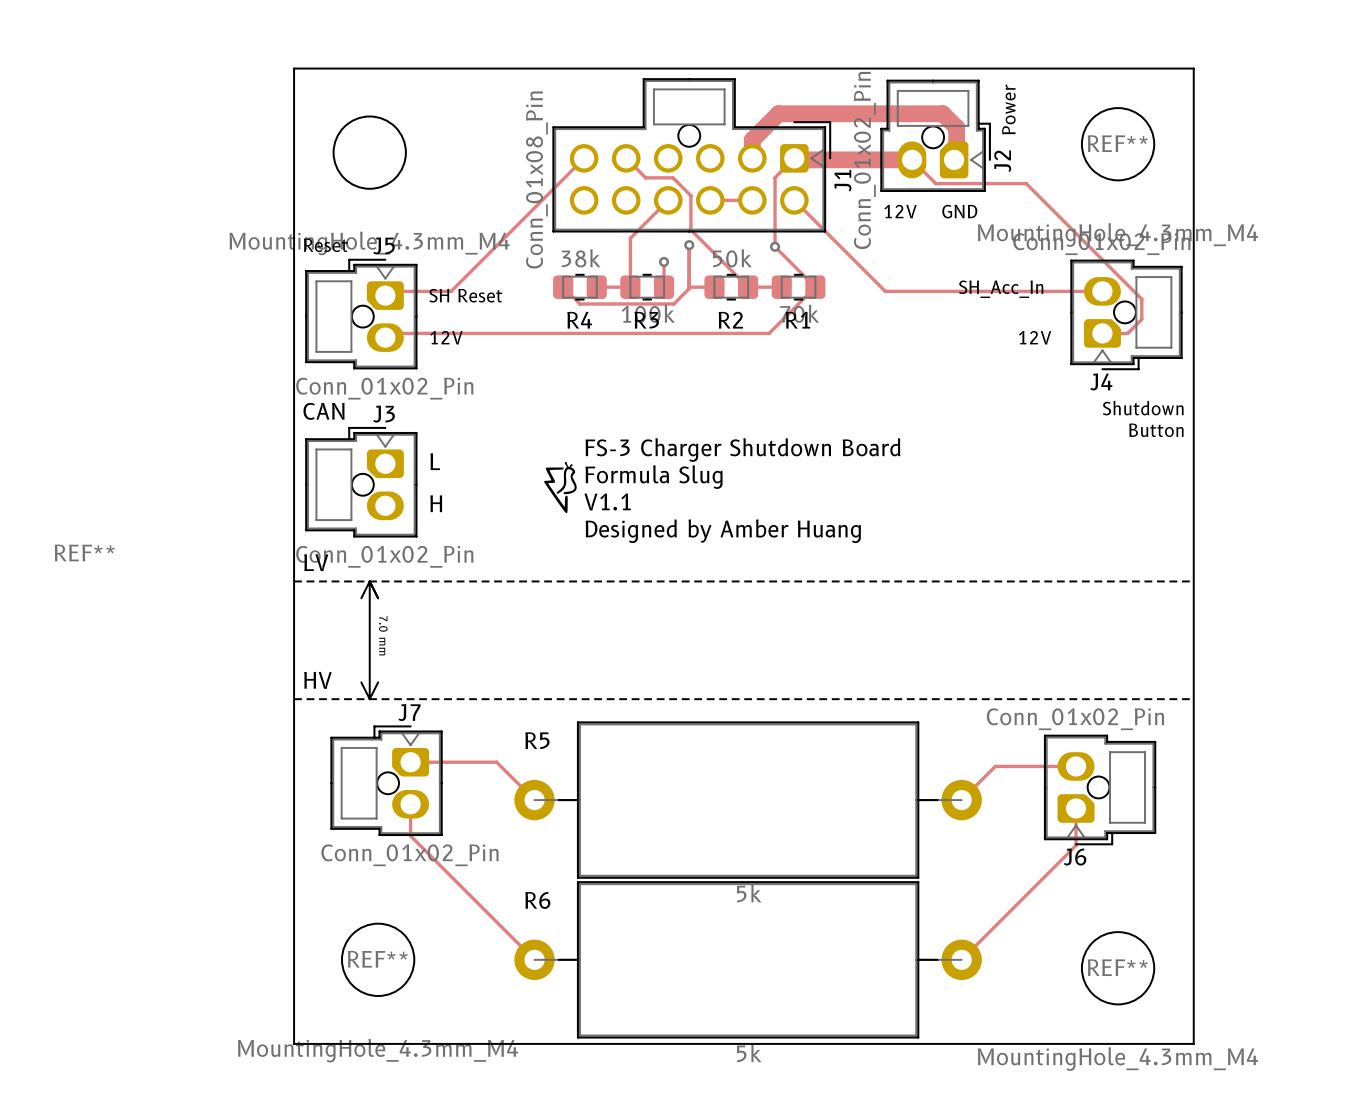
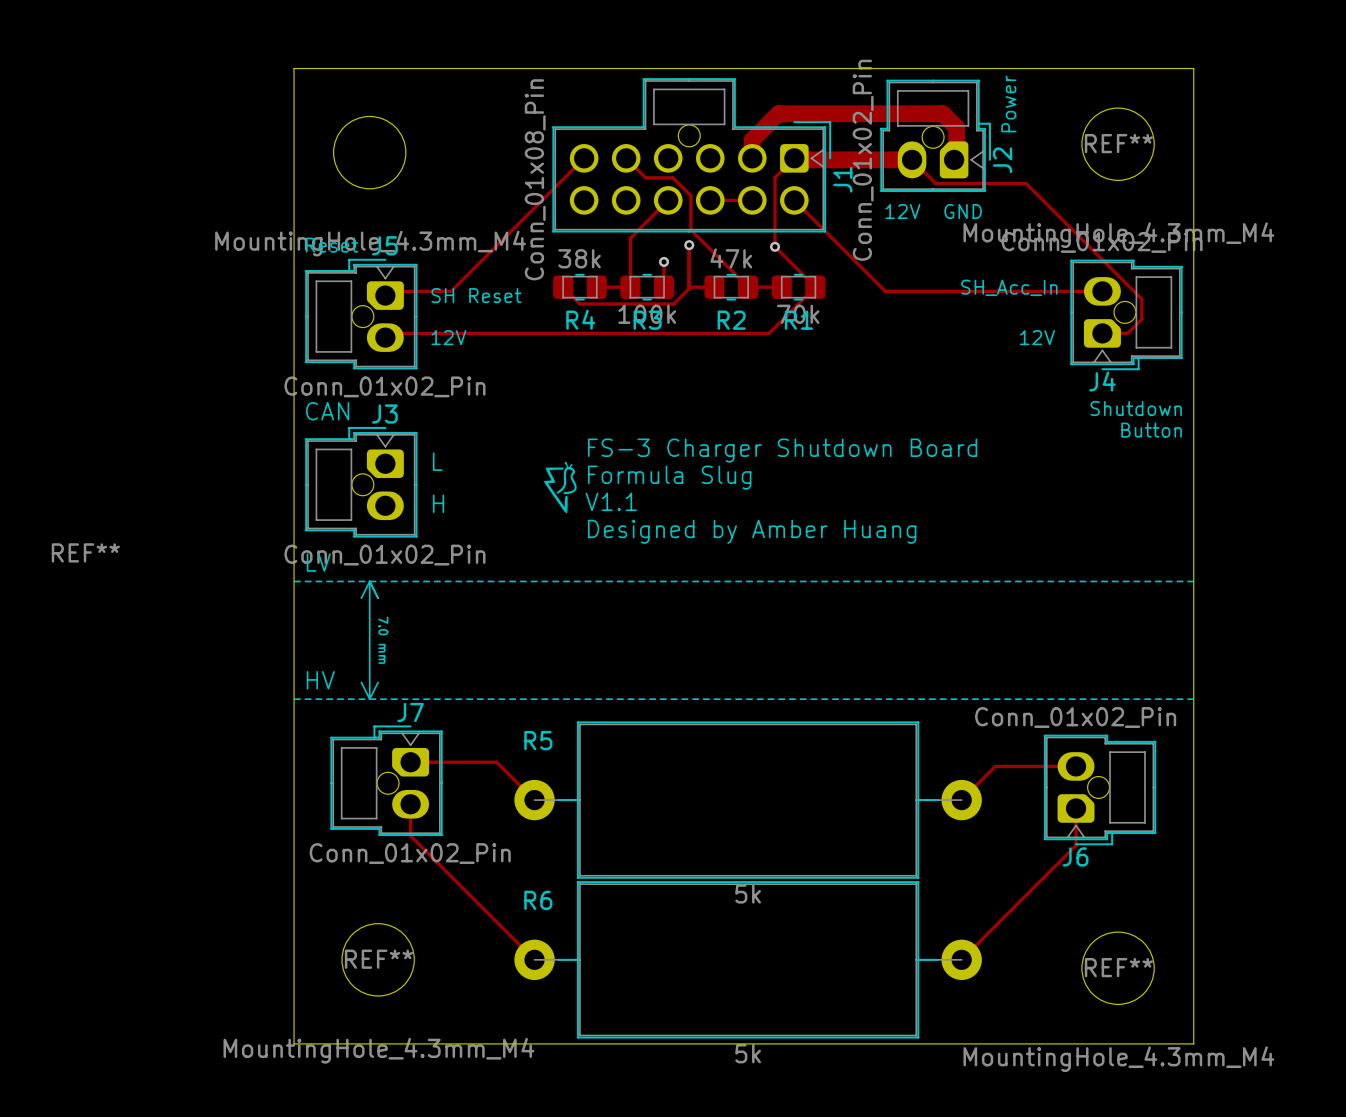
R2 value: 50k (732, 258) -> 47k (731, 258)

